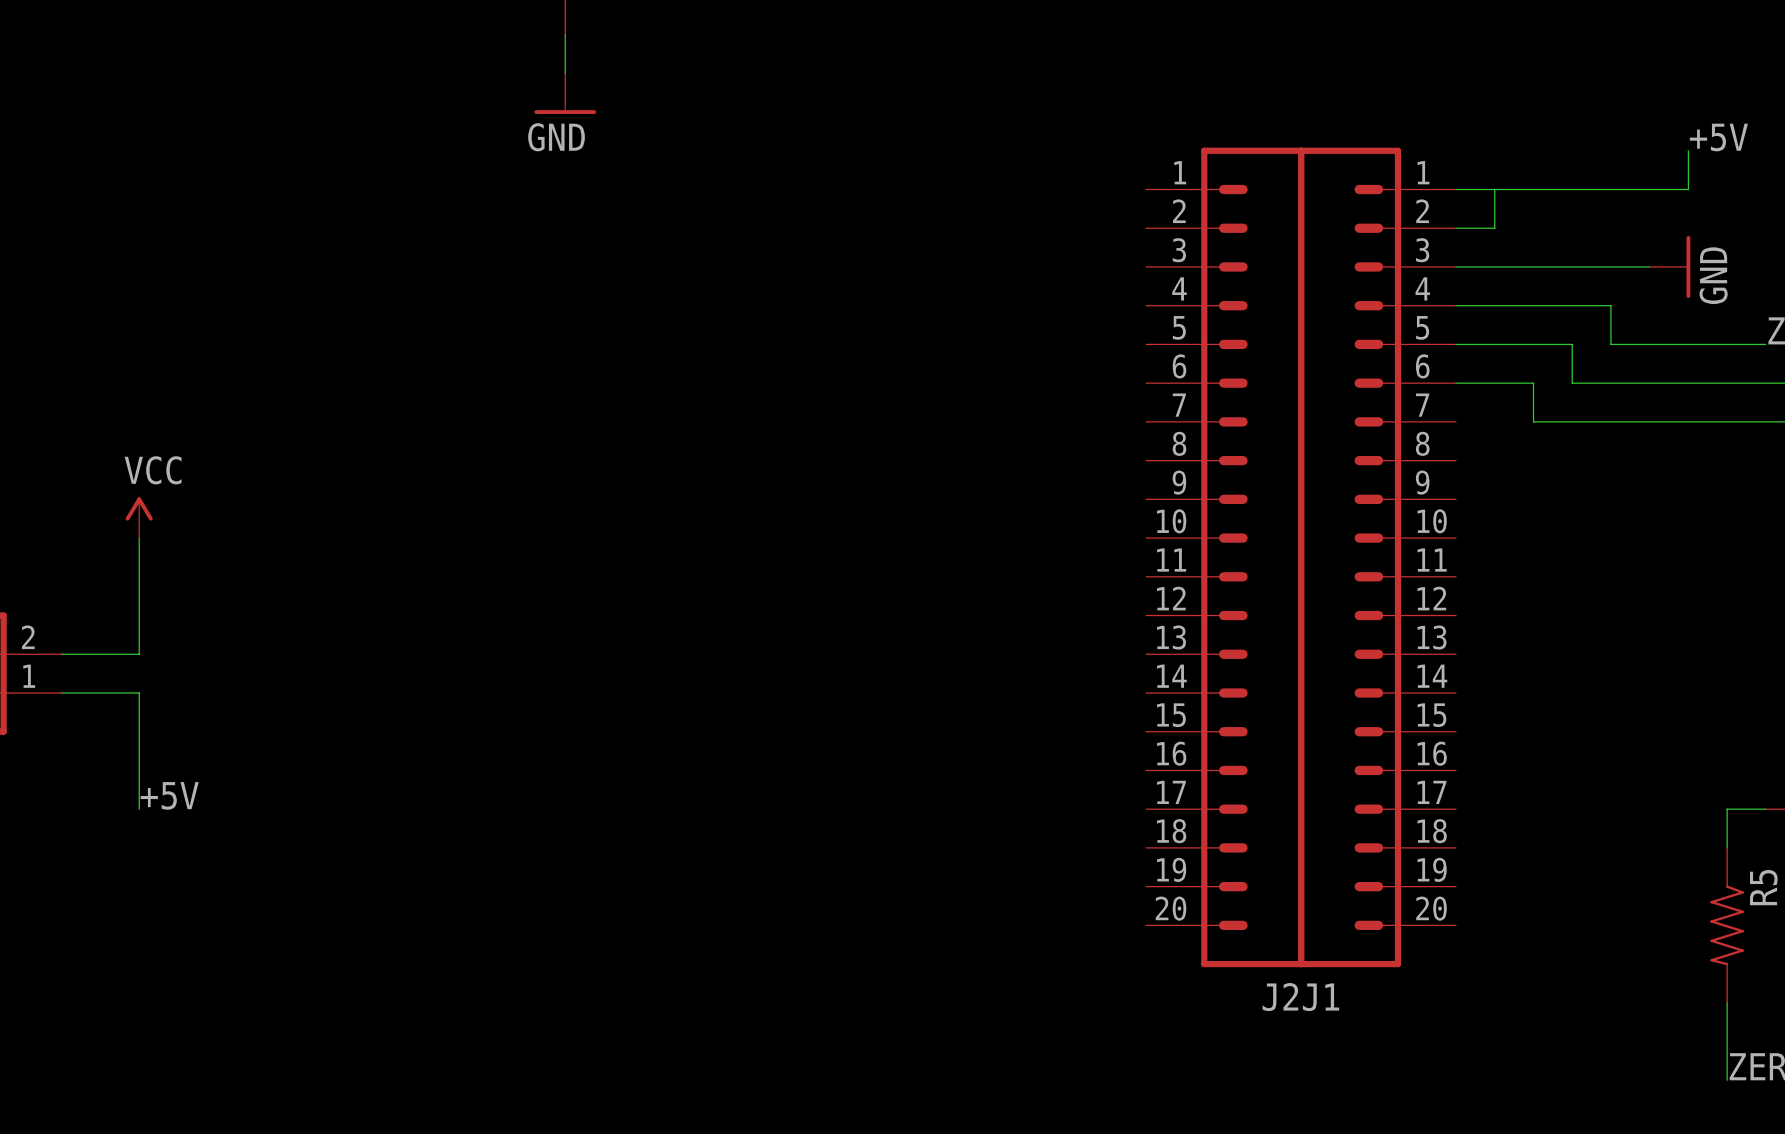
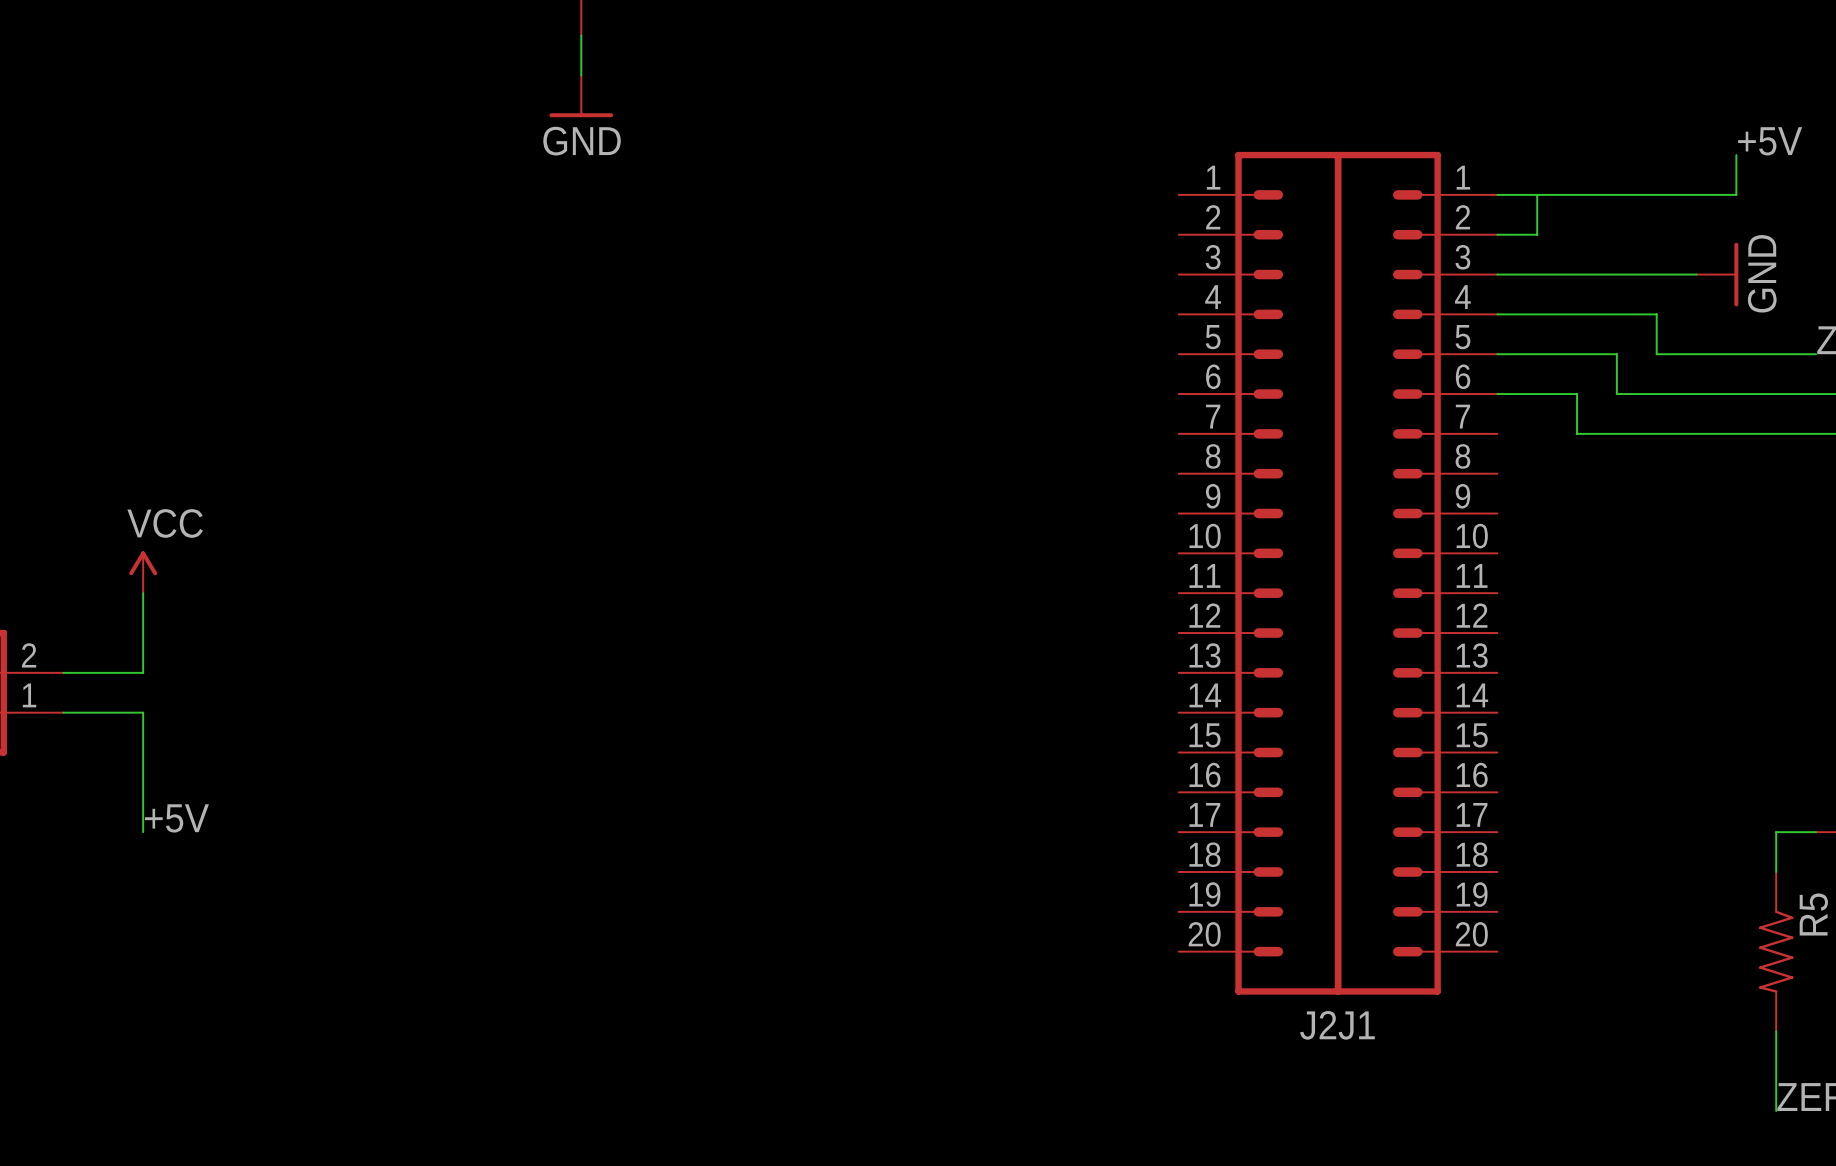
power symbol position: VCC (139, 517) -> VCC (143, 572)

